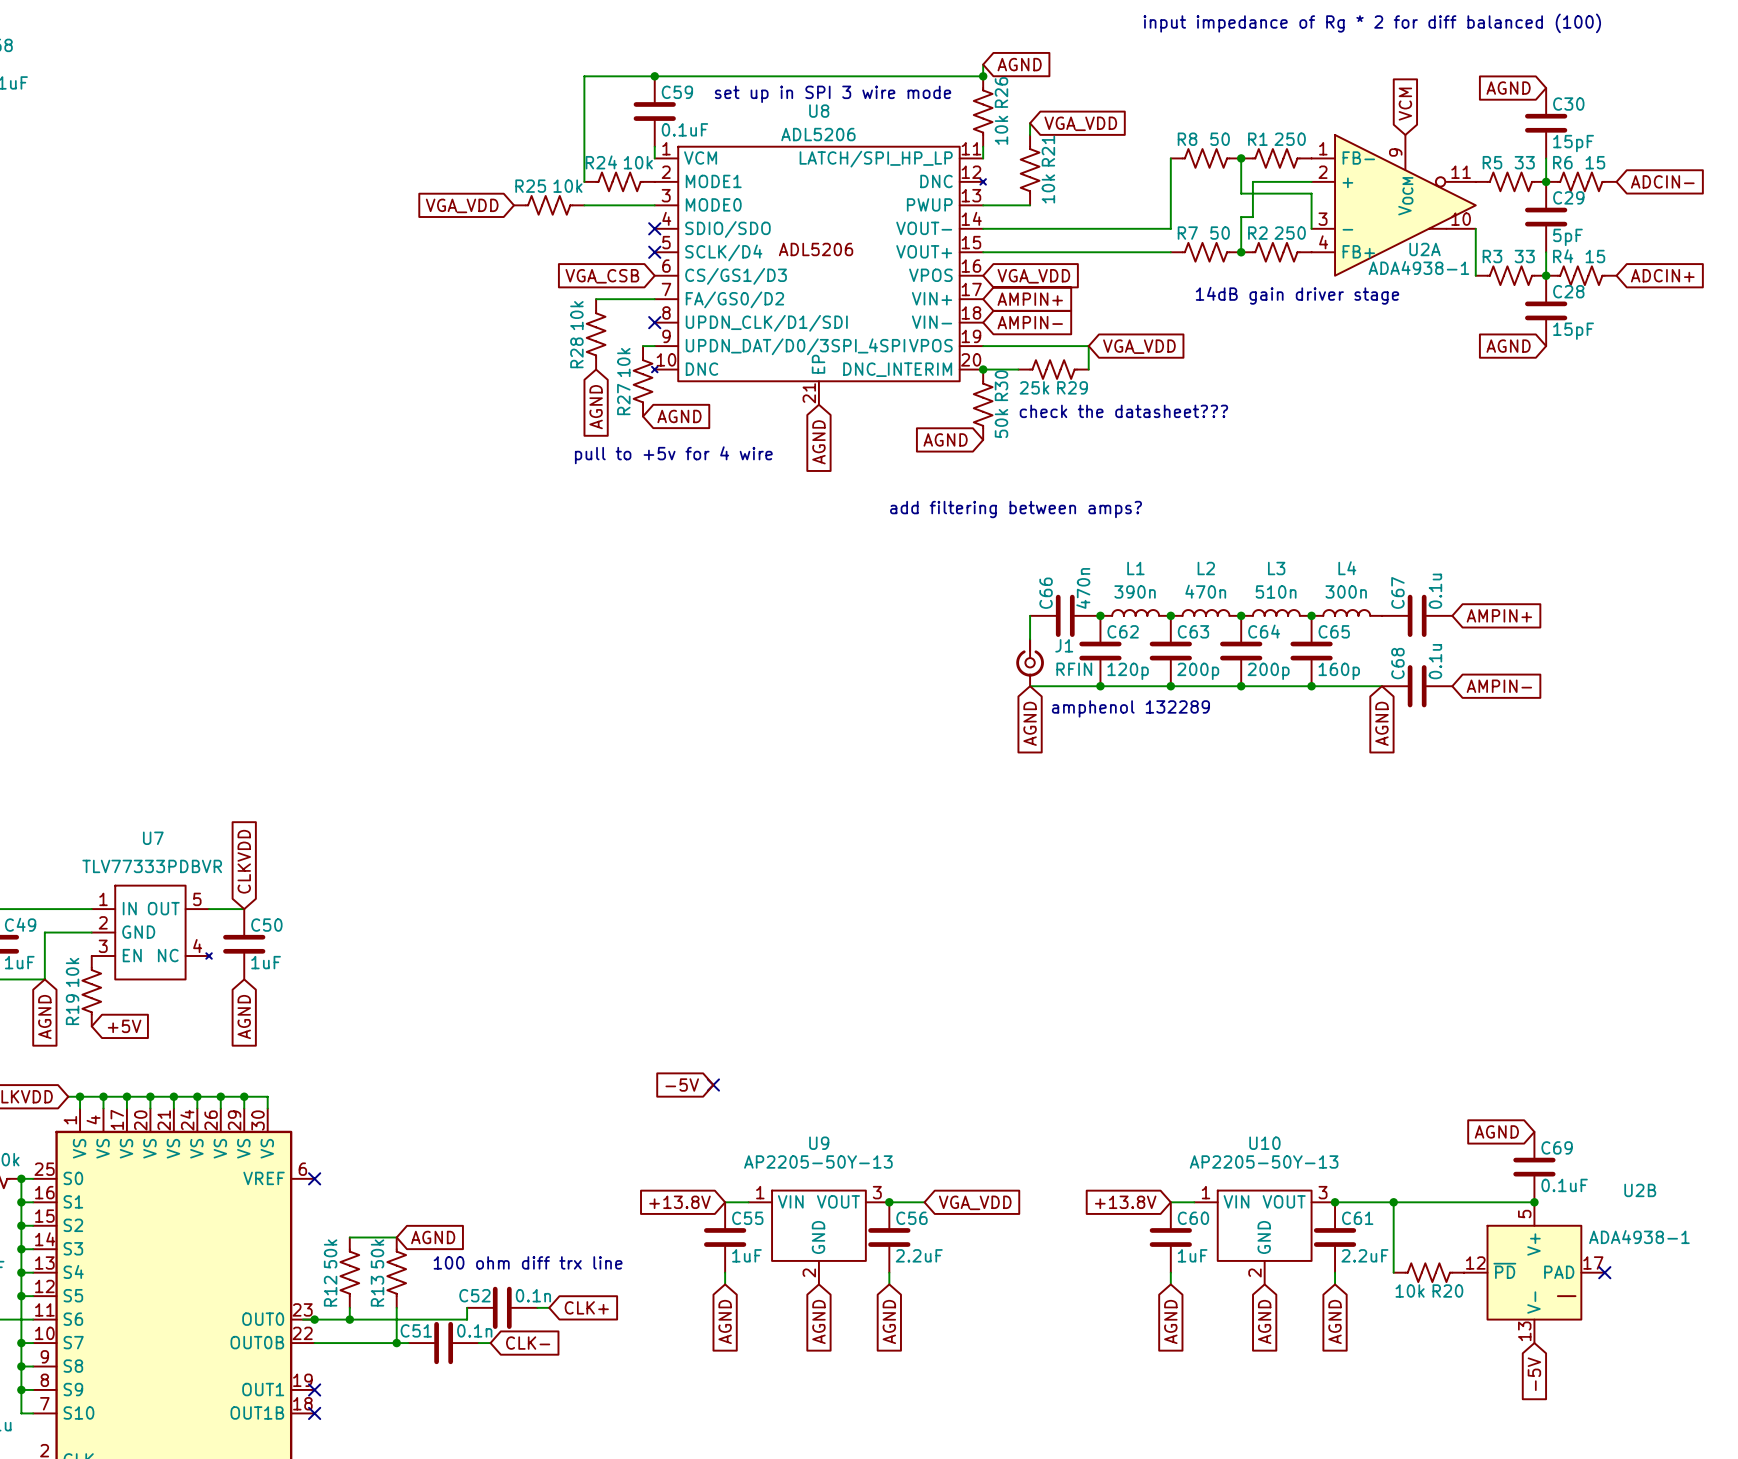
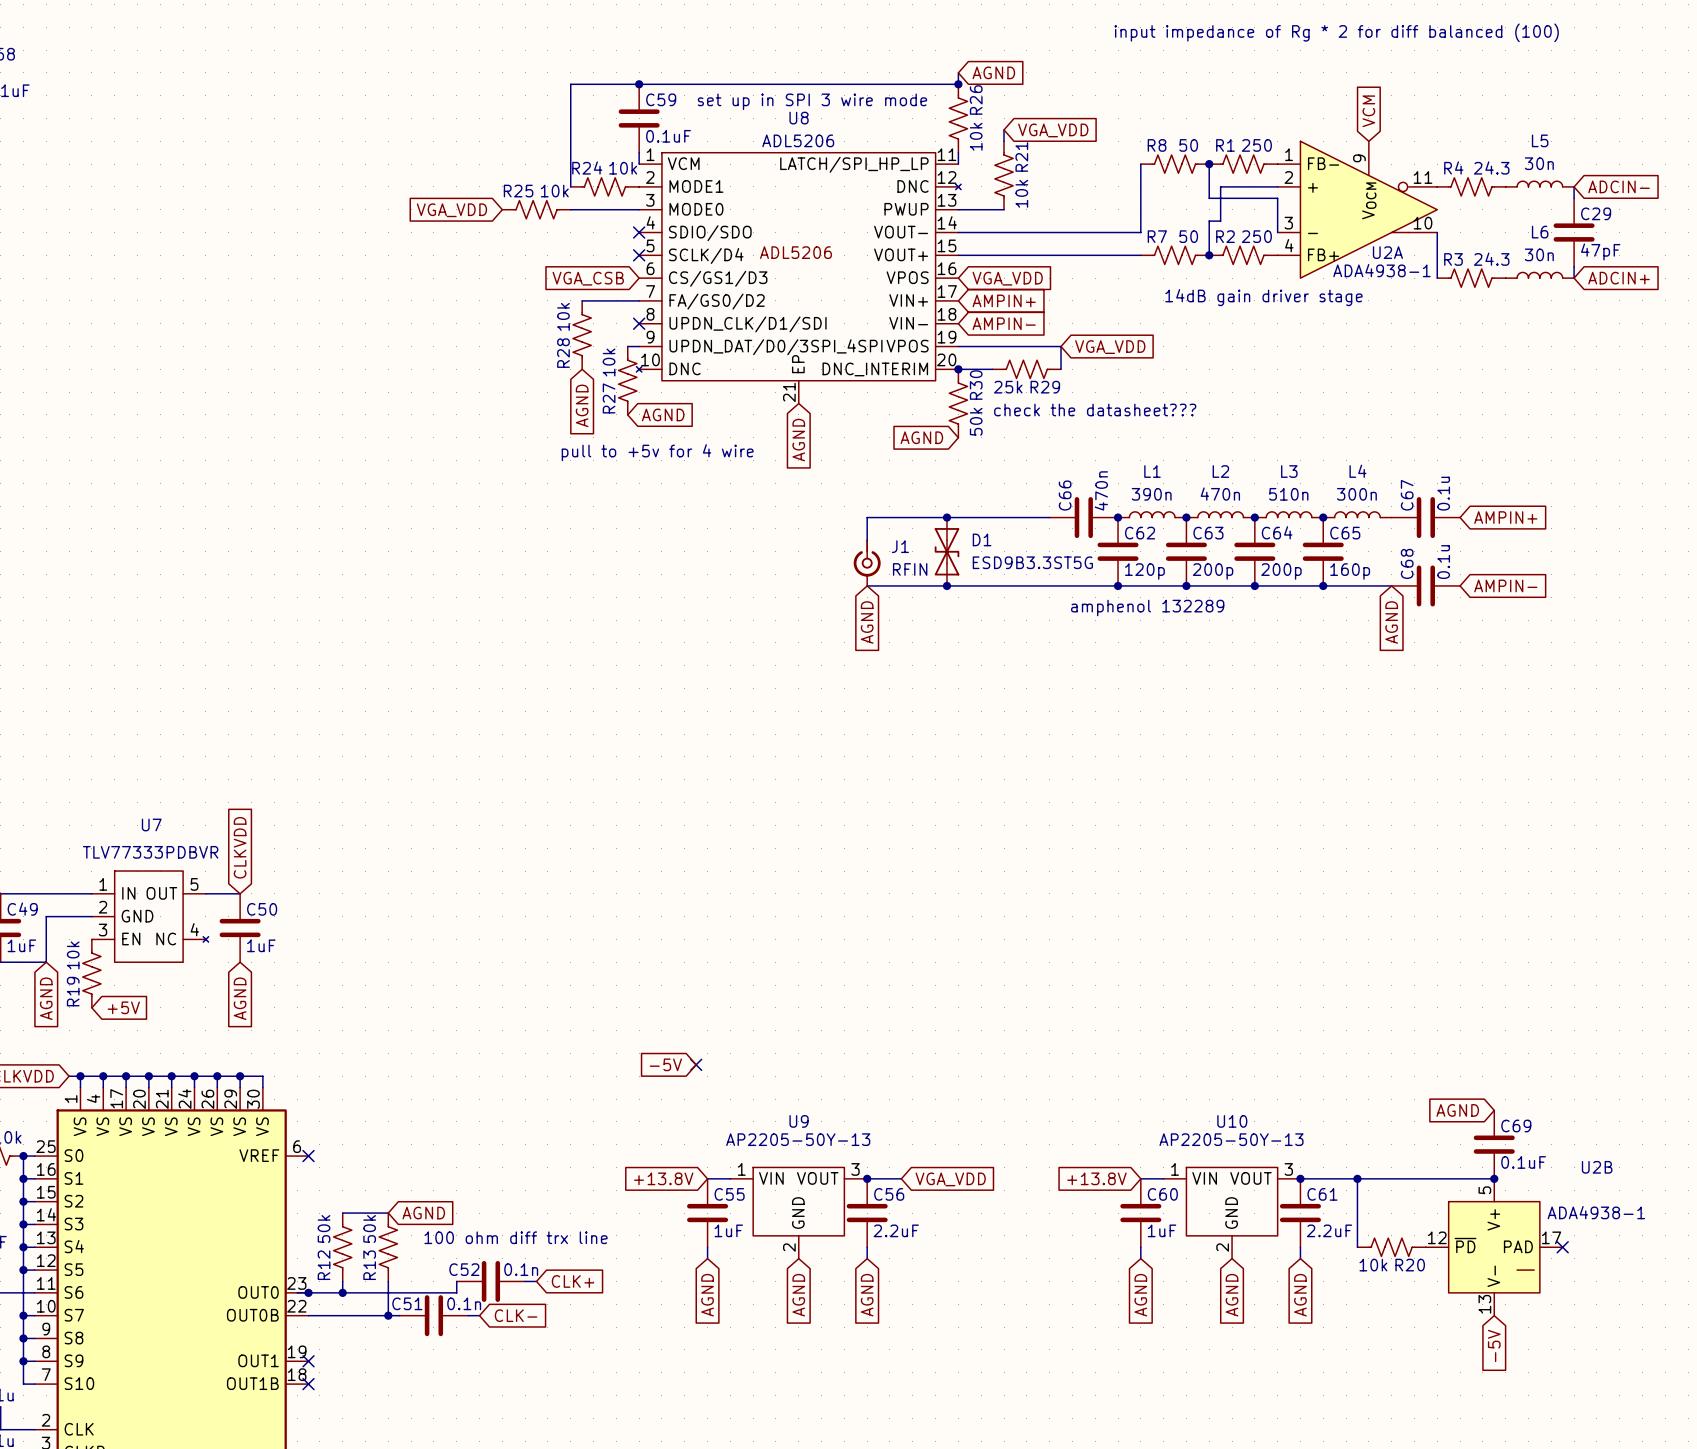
global label: AGND (1508, 88) -> none
C30: 15pF (1546, 123) -> none
wire: (1546, 158) (1546, 181) -> none
R5 name: R5 (1492, 162) -> R4 (1453, 167)
R5 value: 33 (1524, 162) -> 24.3 (1491, 167)
L5: none -> 30n (1539, 184)
junction: (1546, 181) -> none
R6: 15 (1581, 181) -> none
wire: none -> (1574, 186) (1574, 198)
C29 position: (1546, 217) -> (1574, 232)
C29 value: 5pF (1567, 237) -> 47pF (1600, 251)
wire: (1546, 252) (1546, 275) -> none
R3 value: 33 (1524, 256) -> 24.3 (1491, 259)
wire: none -> (1574, 266) (1574, 278)
L6: none -> 30n (1539, 275)
junction: (1546, 275) -> none
R4: 15 (1581, 275) -> none
C28: 15pF (1546, 310) -> none
global label: AGND (1508, 346) -> none
text: add filtering between amps? (1016, 509) -> none
junction: none -> (946, 517)
wire: none -> (1049, 517) (867, 517) (867, 540)
junction: none -> (1118, 517)
junction: none -> (1186, 517)
junction: none -> (1254, 517)
junction: none -> (1323, 517)
D1: none -> ESD9B3.3ST5G (946, 551)
wire: none -> (867, 585) (1391, 585)
junction: none -> (946, 585)
junction: none -> (1118, 585)
junction: none -> (1186, 585)
junction: none -> (1254, 585)
junction: none -> (1323, 585)
L1 position: (1135, 612) -> (1152, 514)
L2 position: (1206, 612) -> (1220, 514)
L3 position: (1276, 612) -> (1289, 514)
L4 position: (1346, 612) -> (1357, 514)
wire: (1030, 615) (1030, 639) -> none
C66 position: (1065, 615) -> (1083, 517)
junction: (1100, 615) -> none
junction: (1170, 615) -> none
junction: (1241, 615) -> none
junction: (1311, 615) -> none
C67 position: (1417, 615) -> (1425, 517)
global label position: AMPIN+ (1499, 615) -> AMPIN+ (1505, 517)
C62 position: (1100, 651) -> (1118, 551)
C63 position: (1170, 651) -> (1186, 551)
C64 position: (1241, 651) -> (1254, 551)
C65 position: (1311, 651) -> (1323, 551)
J1 position: (1030, 662) -> (867, 563)
wire: (1030, 686) (1381, 686) -> none
junction: (1100, 686) -> none
junction: (1170, 686) -> none
junction: (1241, 686) -> none
junction: (1311, 686) -> none
C68 position: (1417, 686) -> (1425, 585)
global label position: AMPIN- (1499, 686) -> AMPIN- (1505, 585)
text position: amphenol 132289 (1130, 708) -> amphenol 132289 (1147, 608)
global label position: AGND (1030, 723) -> AGND (867, 622)
global label position: AGND (1381, 723) -> AGND (1391, 622)

